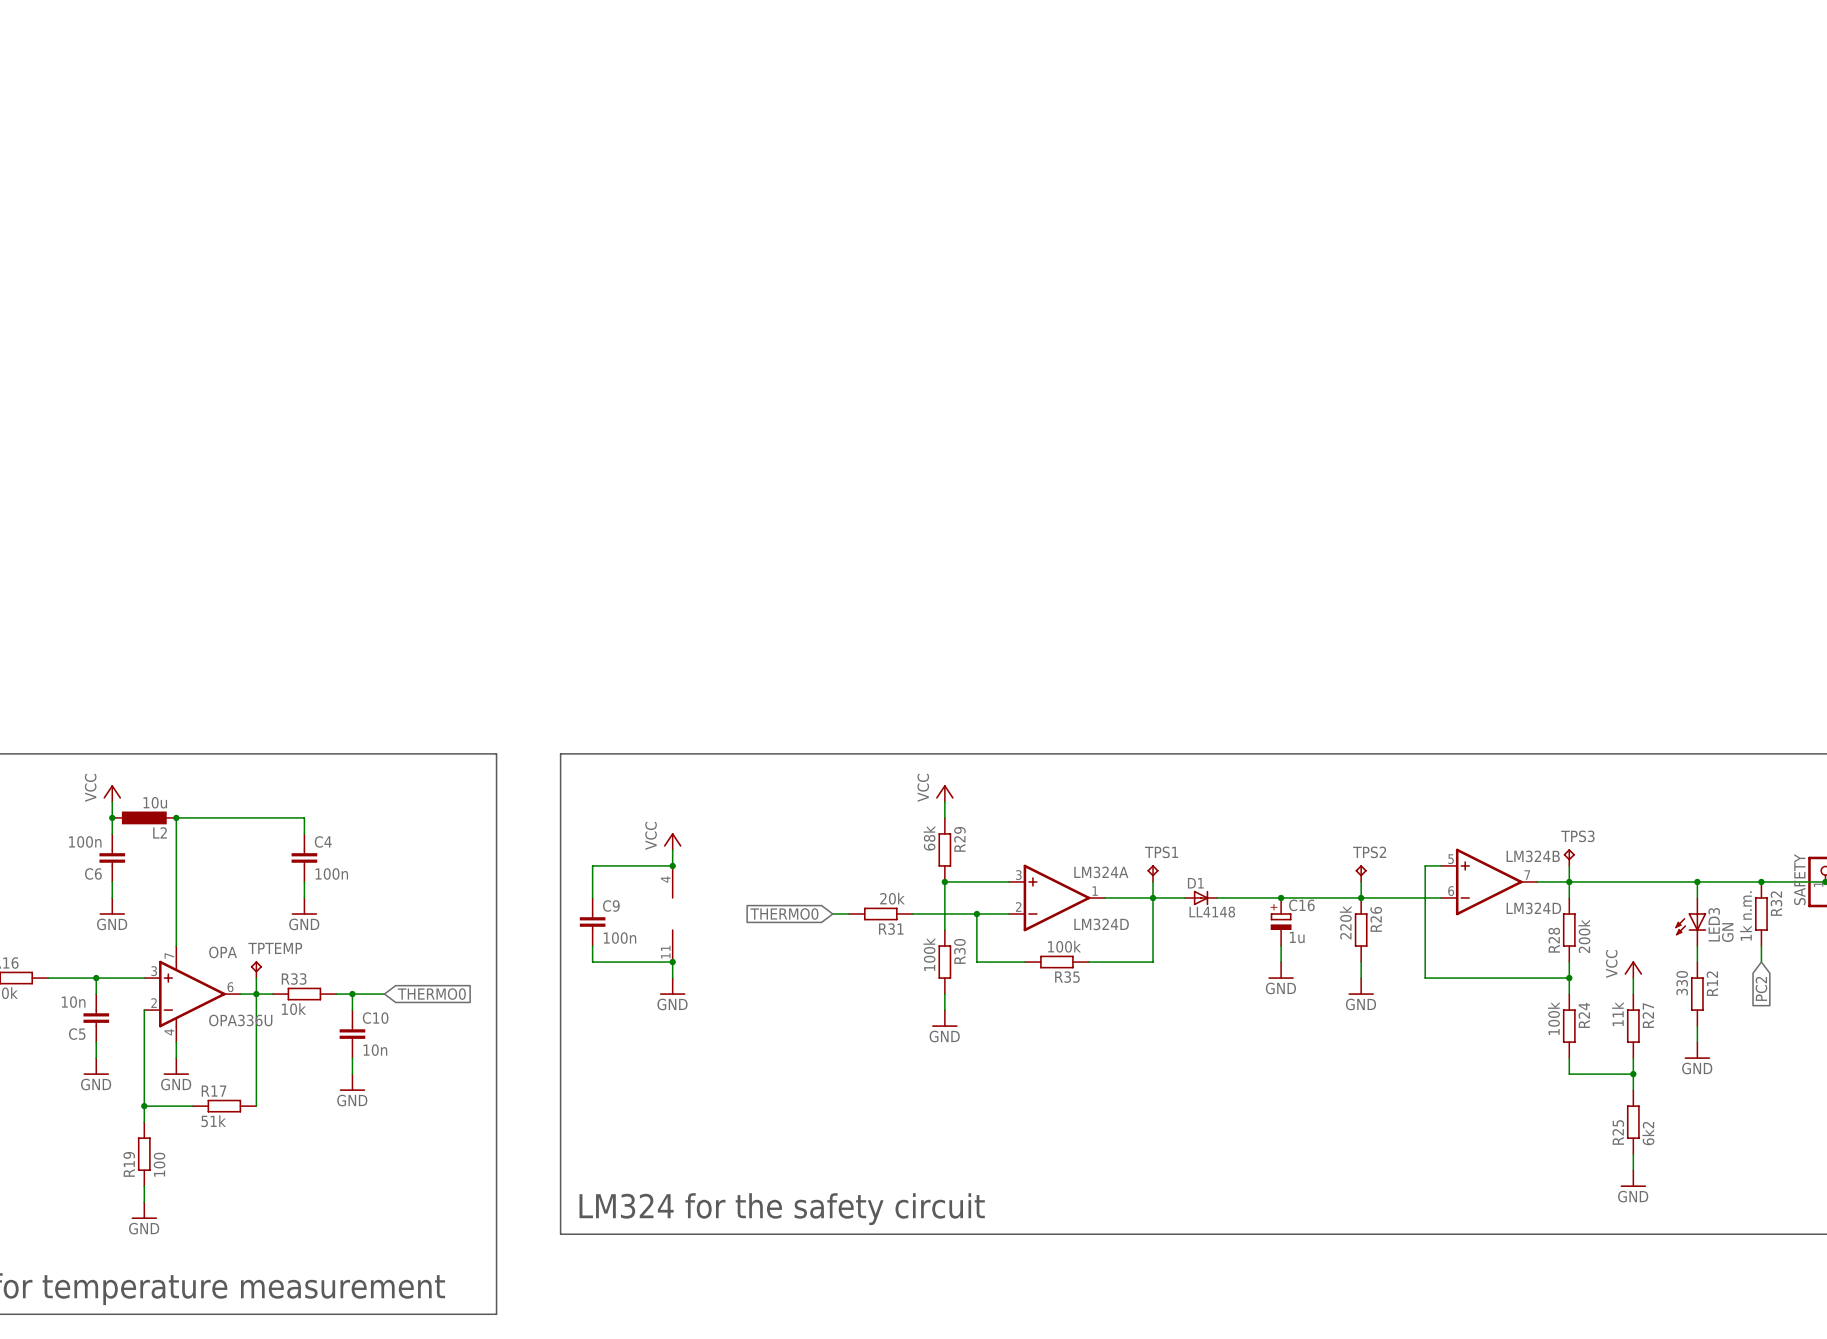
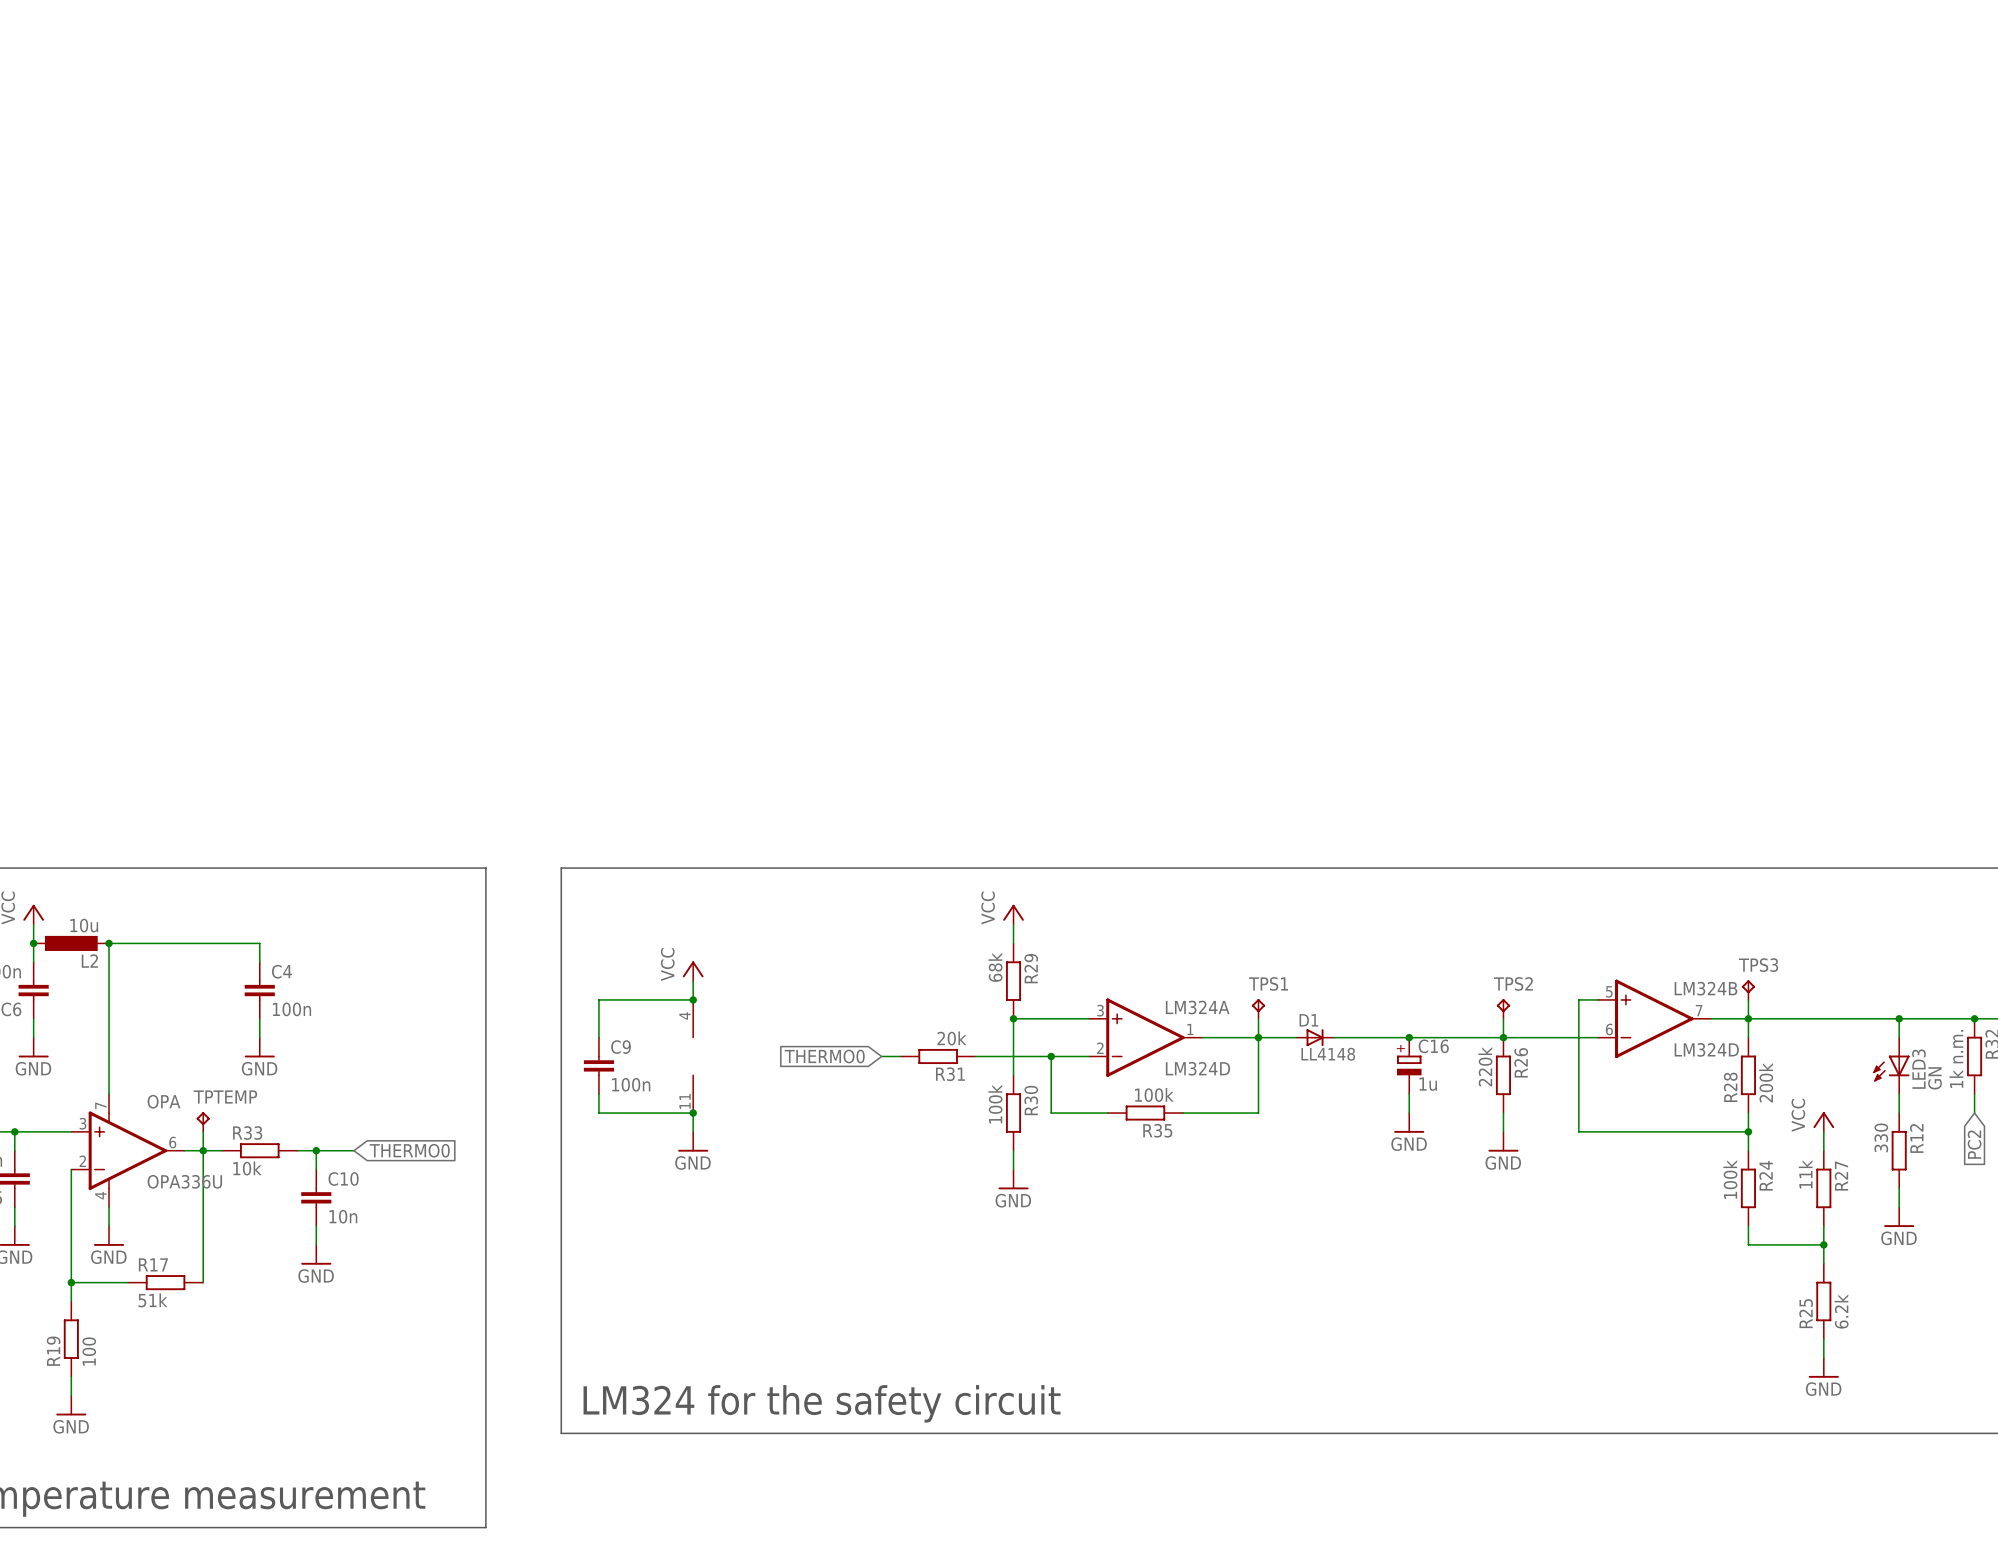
R25 value: 6k2 (1648, 1133) -> 6.2k (1841, 1311)

